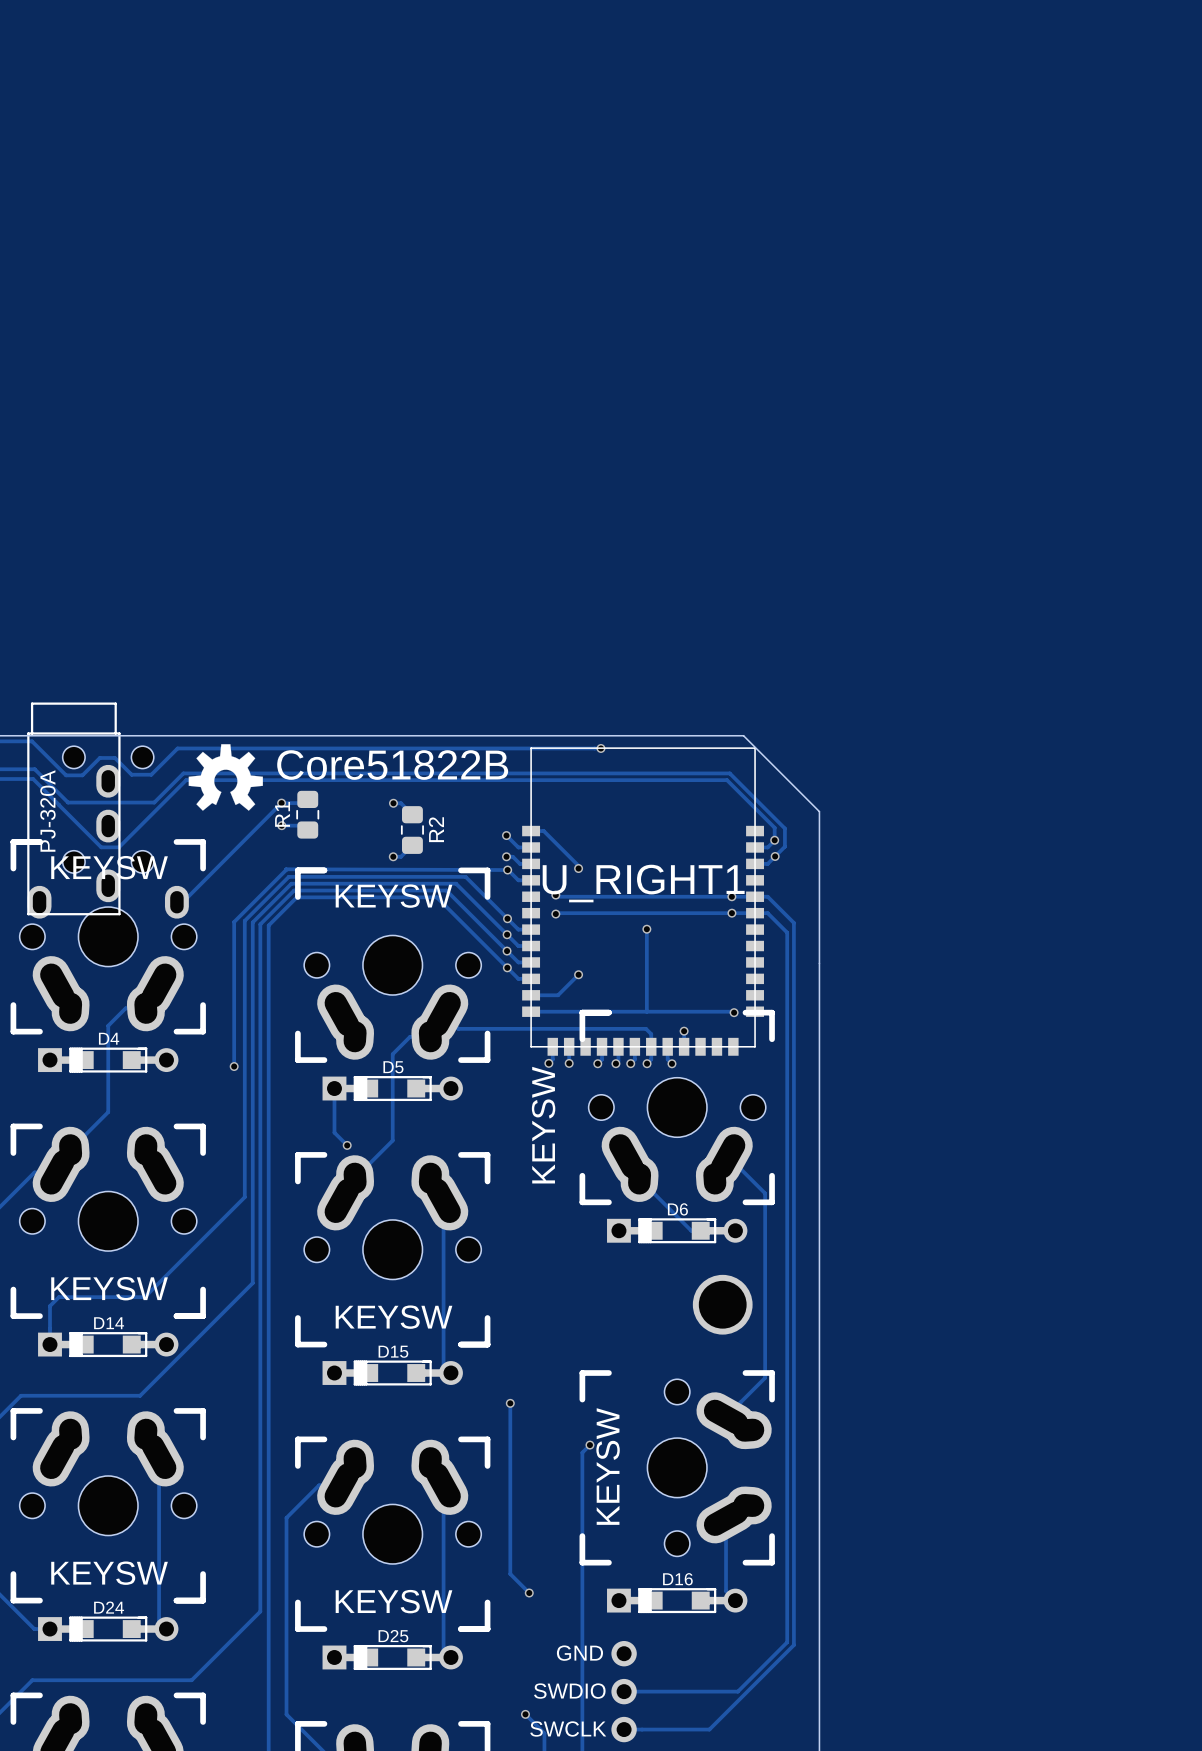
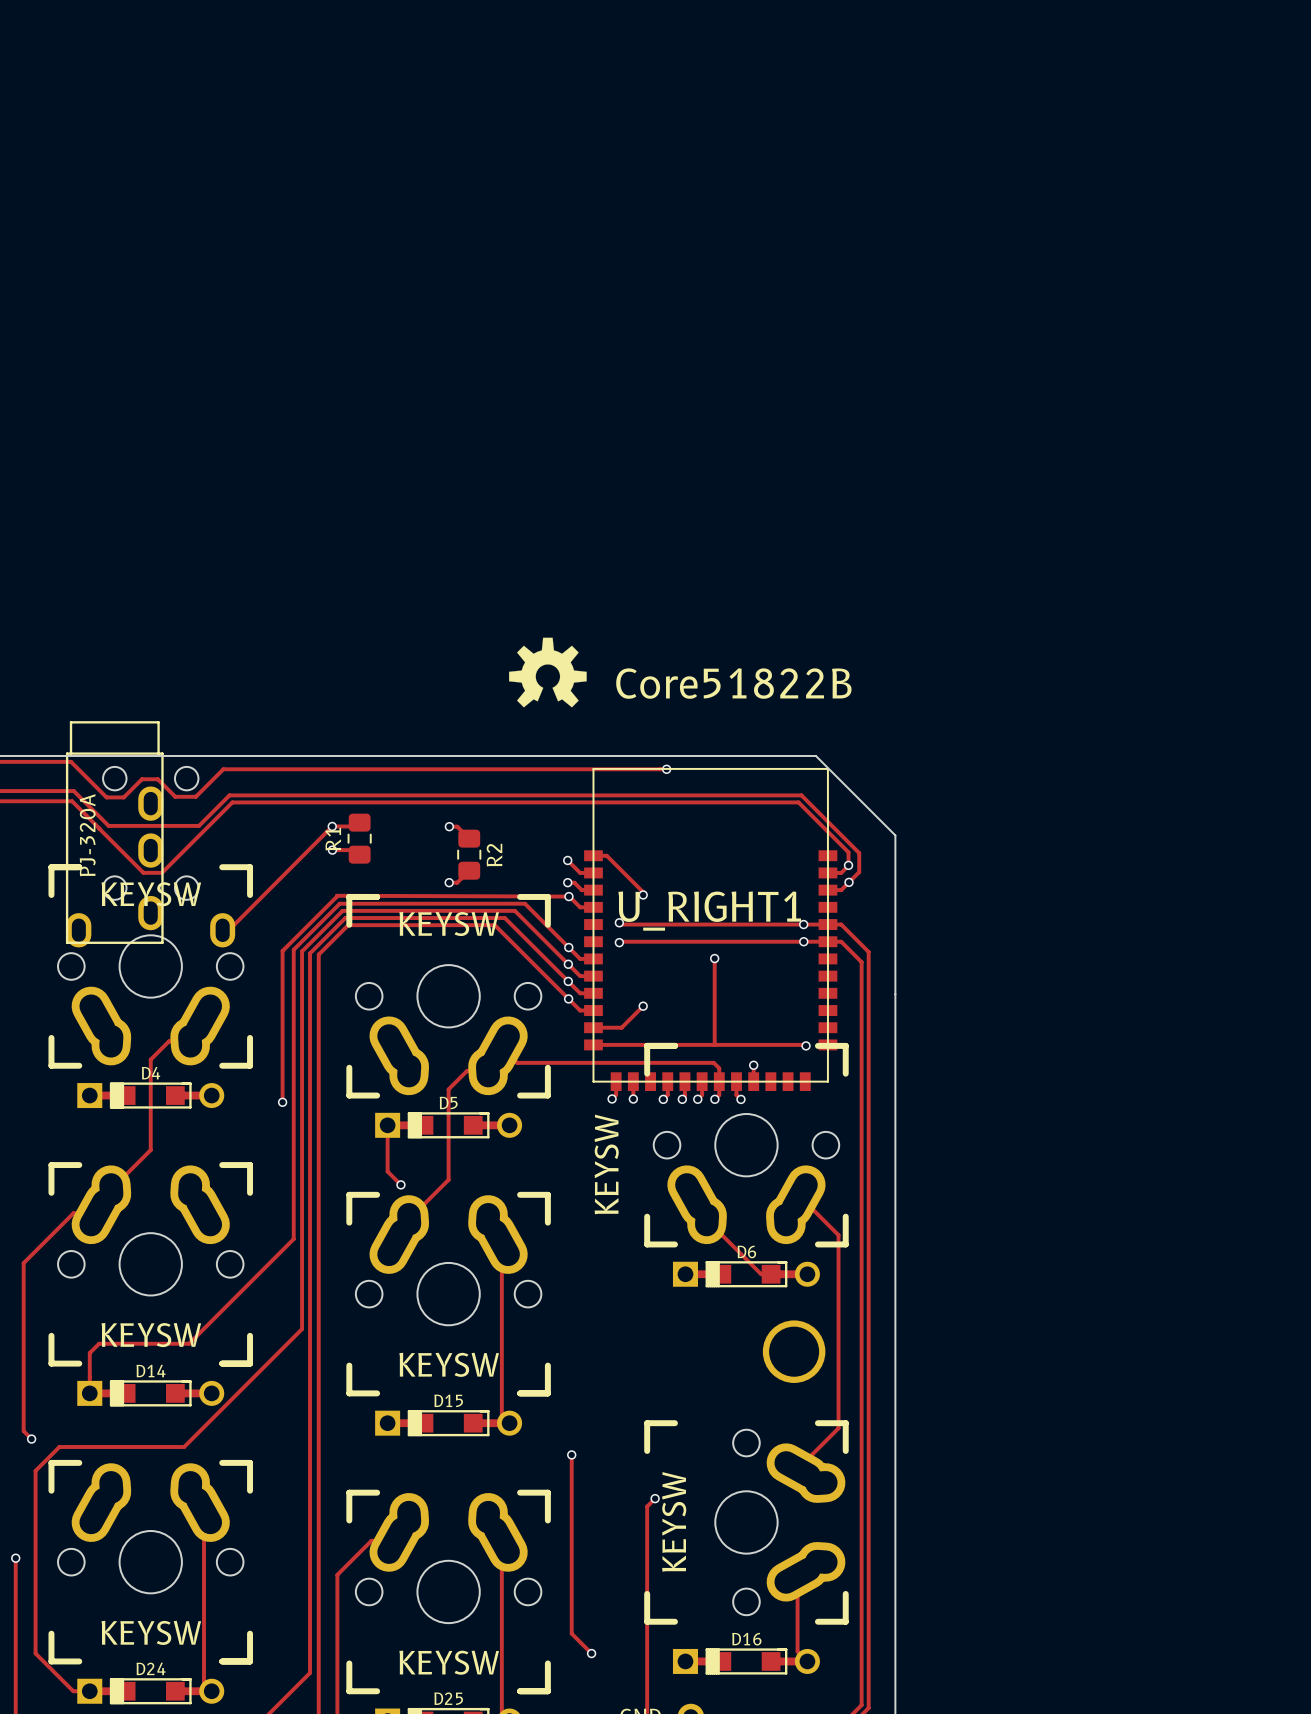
U_RIGHT1 value position: Core51822B (392, 765) -> Core51822B (733, 683)
drawing position: (225, 777) -> (547, 672)

